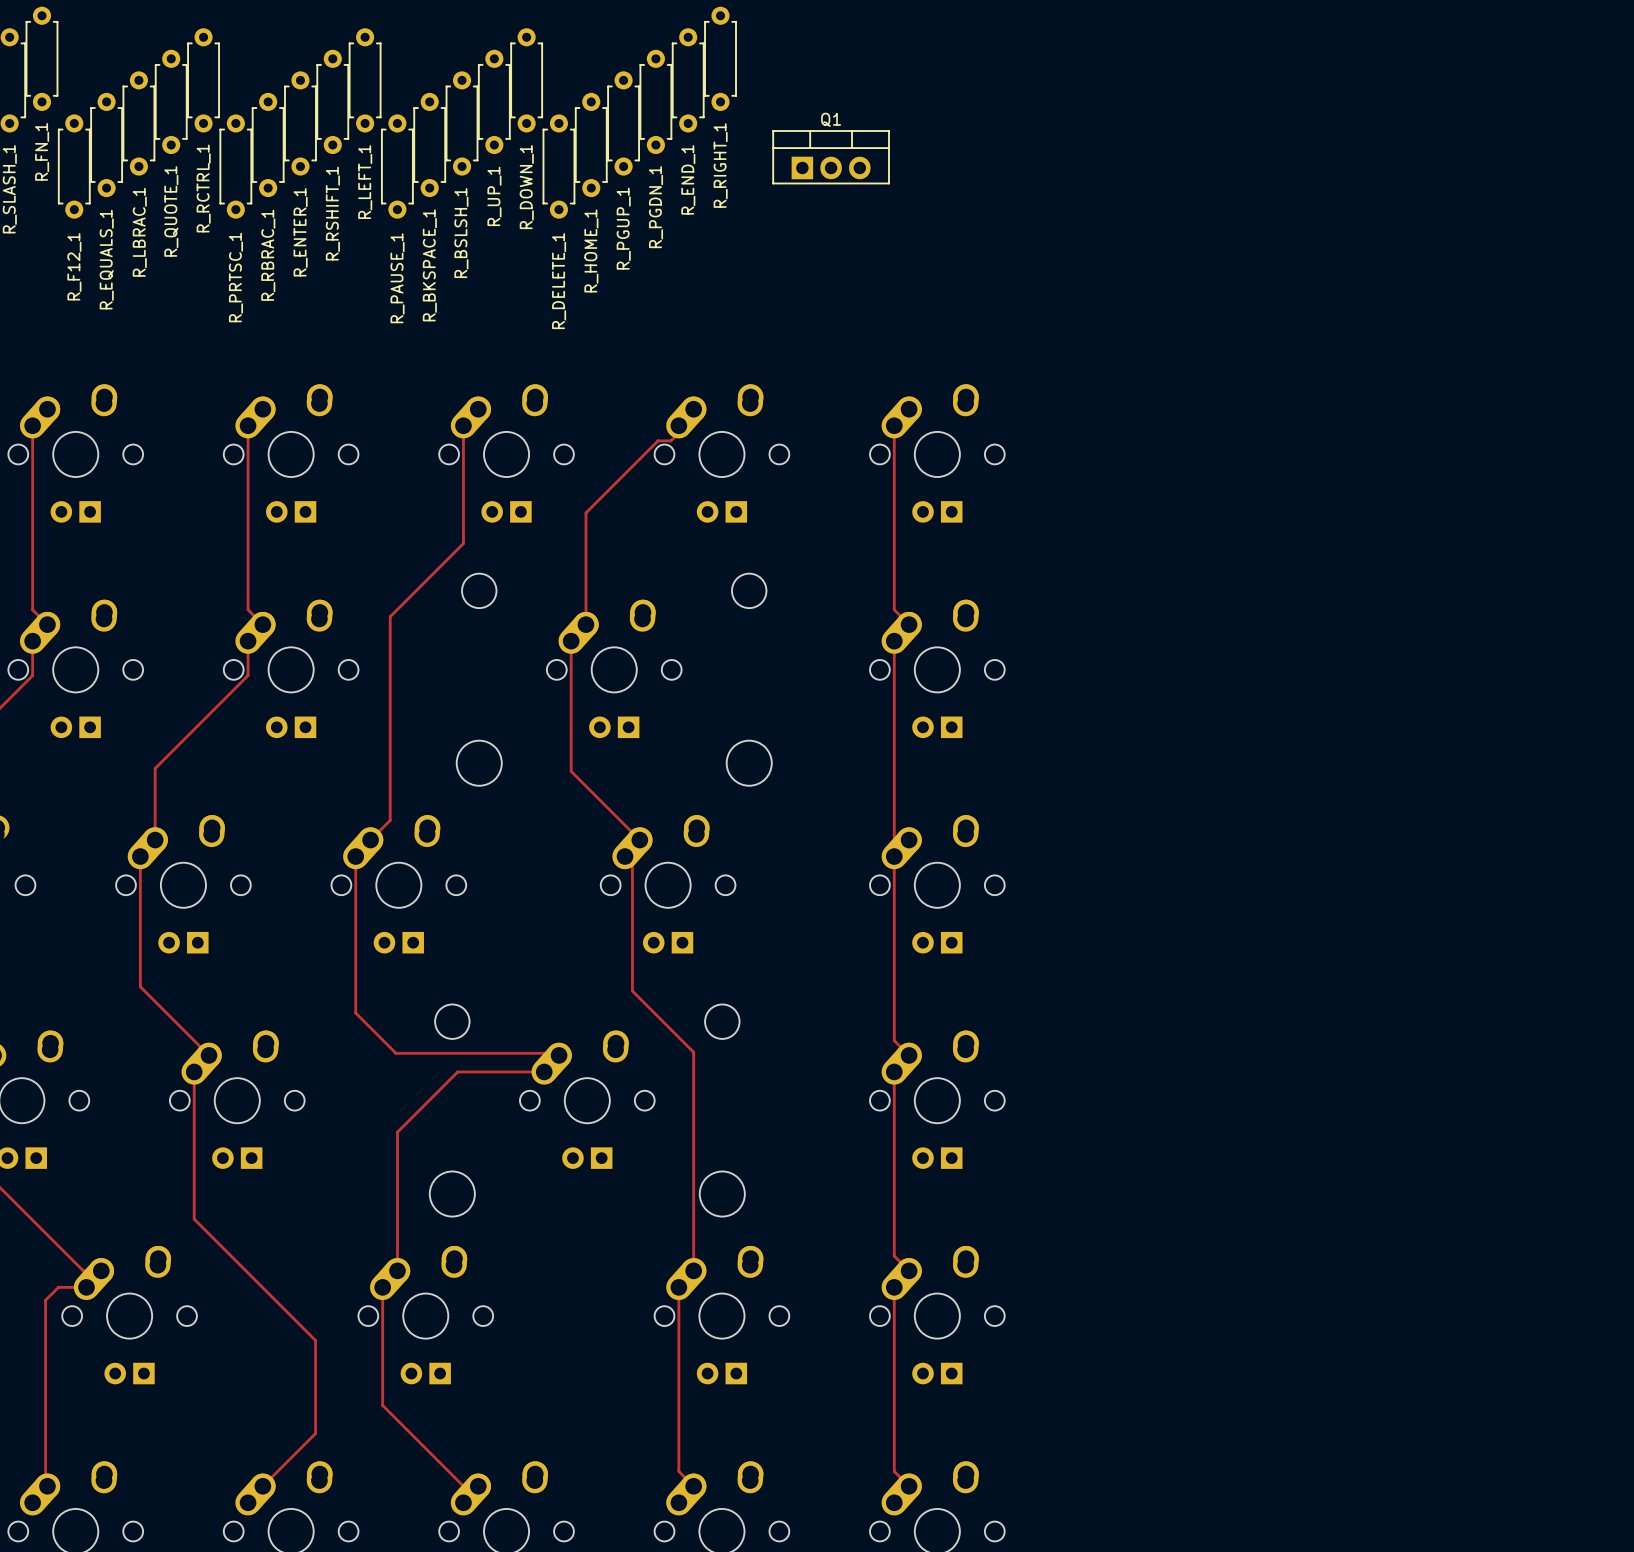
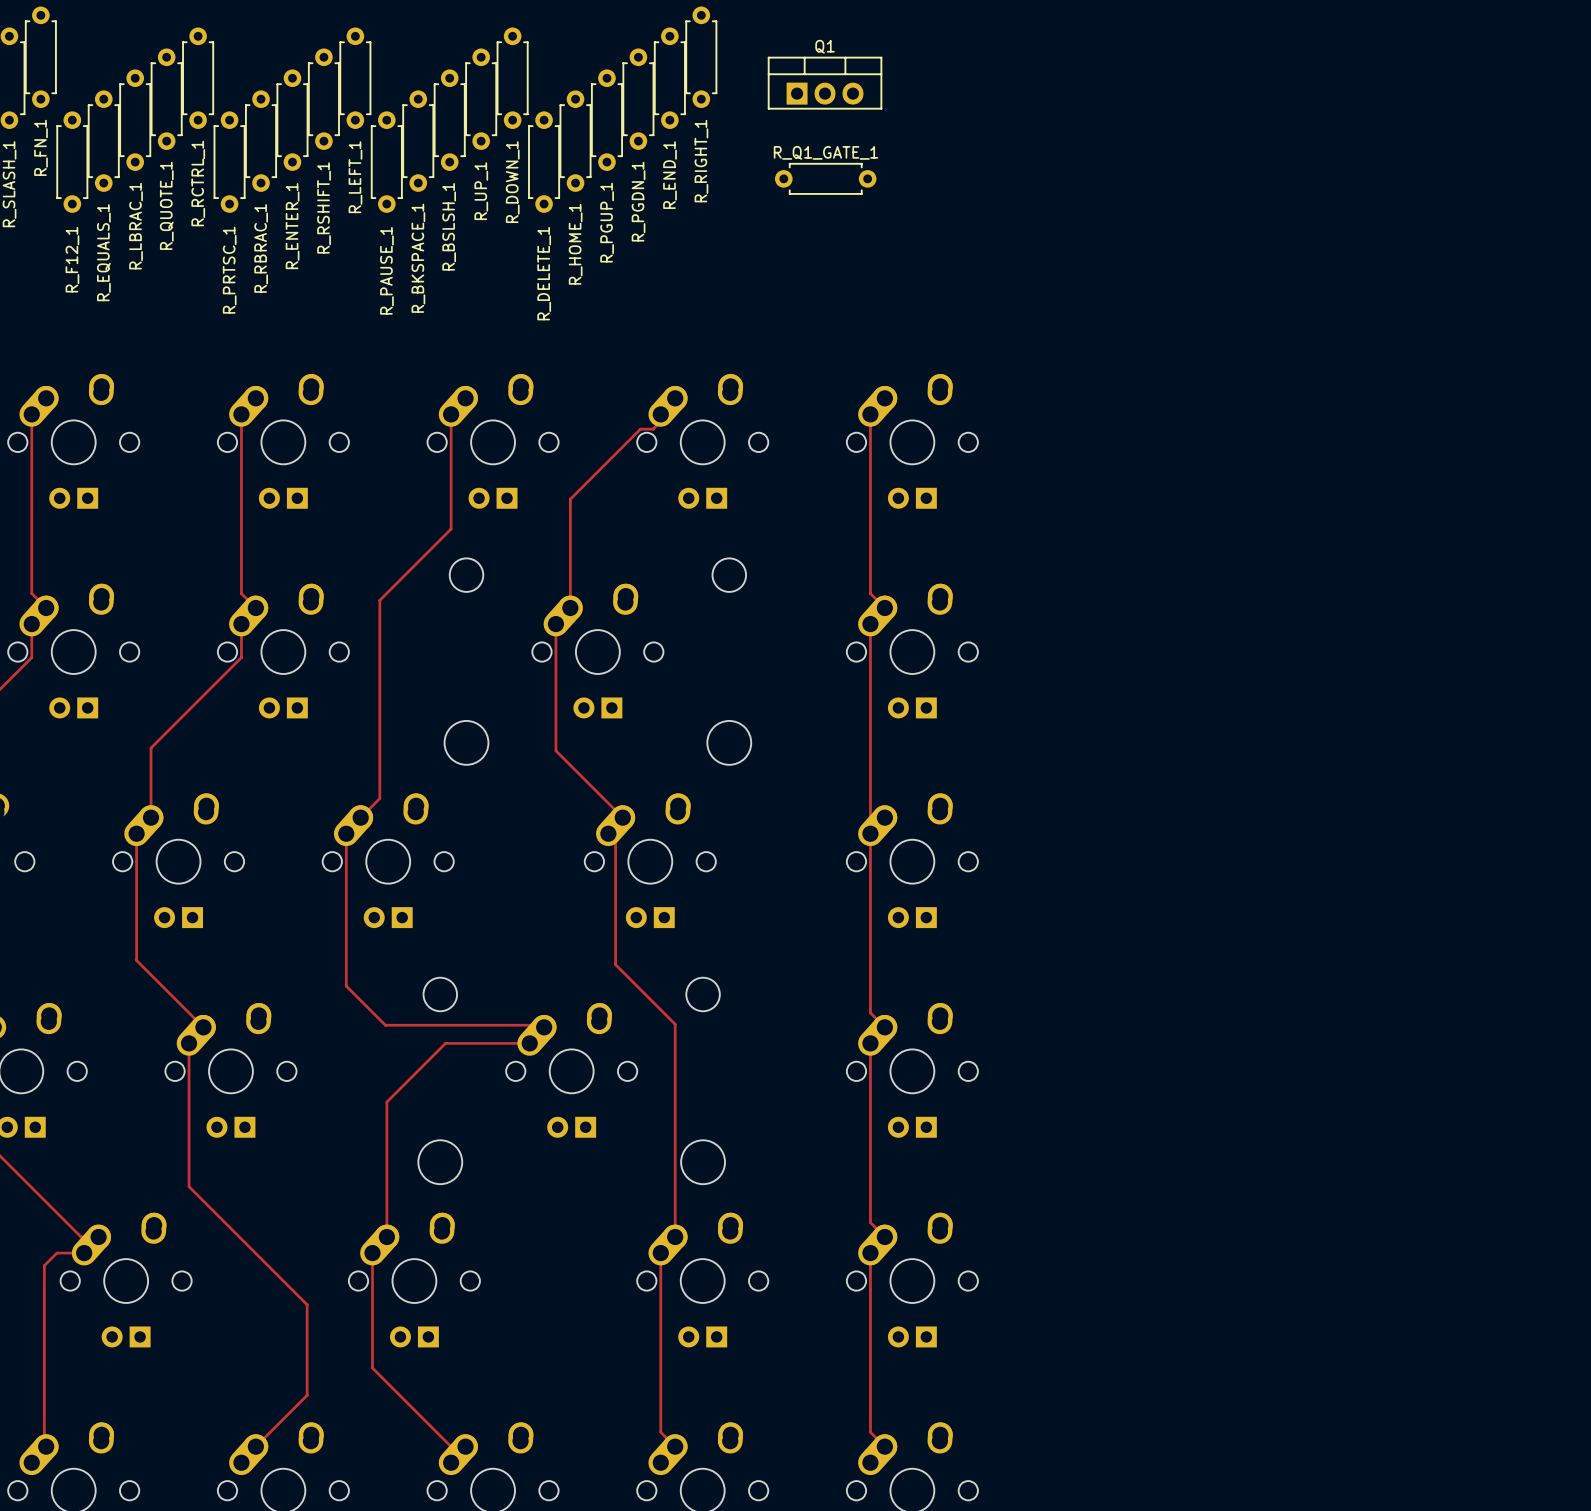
Q1 position: (831, 157) -> (825, 83)
R_Q1_GATE_1: none -> (825, 178)

